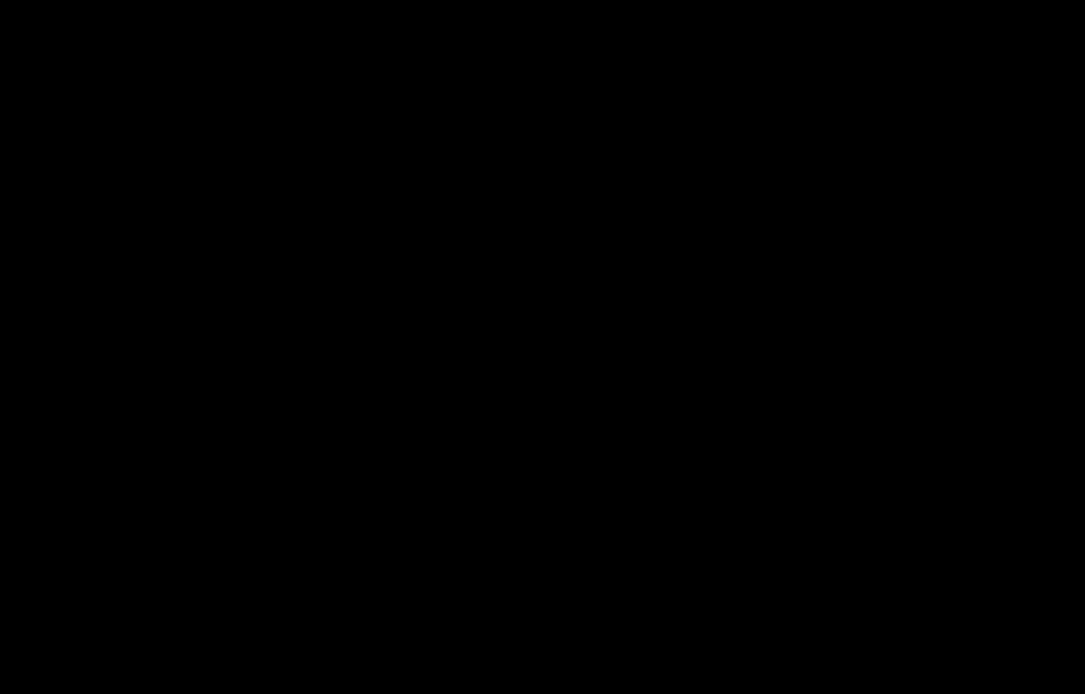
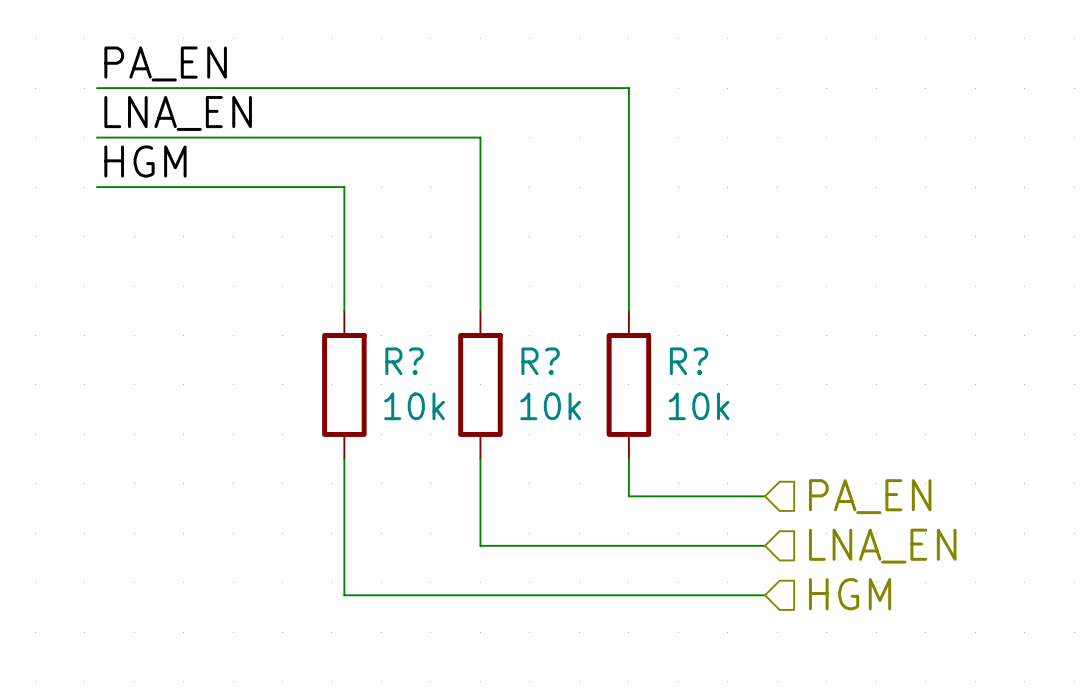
label: none -> PA_EN (165, 63)
wire: none -> (96, 88) (628, 88) (628, 310)
label: none -> LNA_EN (178, 113)
wire: none -> (96, 137) (480, 137) (480, 310)
label: none -> HGM (145, 161)
wire: none -> (96, 187) (344, 187) (344, 310)
R?: none -> 10k (344, 384)
R?: none -> 10k (480, 384)
R?: none -> 10k (628, 384)
wire: none -> (344, 459) (344, 595) (764, 595)
wire: none -> (480, 459) (480, 545) (764, 545)
wire: none -> (628, 459) (628, 496) (764, 496)
hierarchical label: none -> PA_EN (870, 496)
hierarchical label: none -> LNA_EN (882, 546)
hierarchical label: none -> HGM (850, 594)

